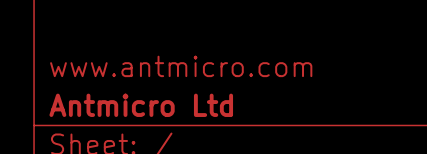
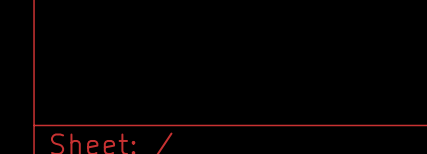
title block: www.antmicro.com (181, 66) -> none
title block: Antmicro Ltd (141, 105) -> none

